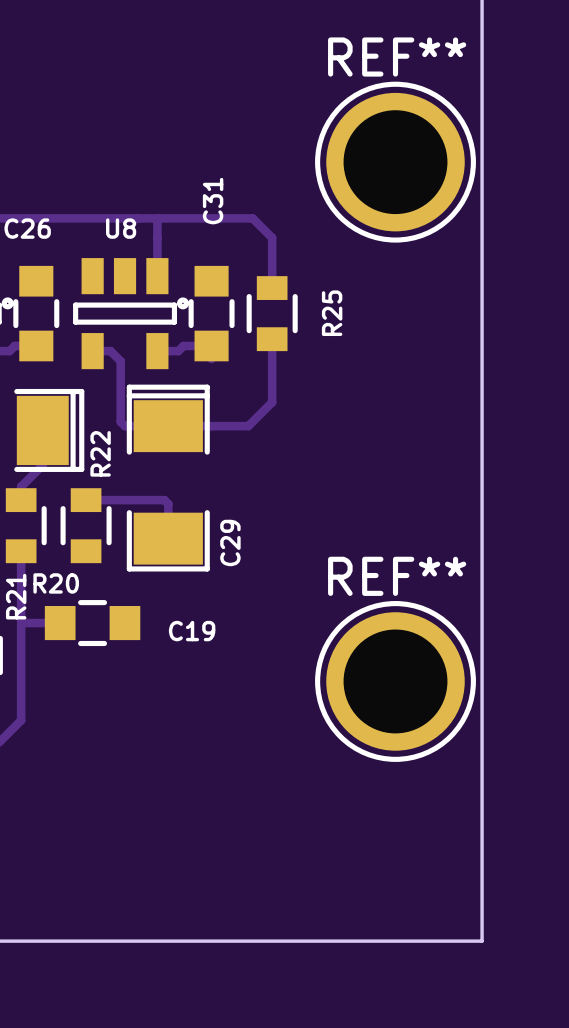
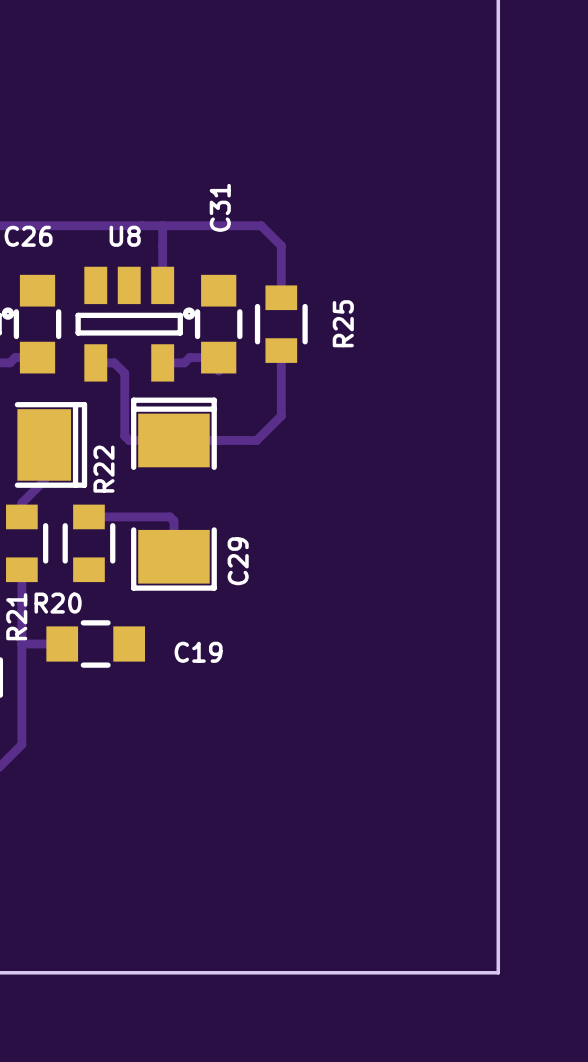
REF**: (395, 162) -> none
REF**: (395, 681) -> none

